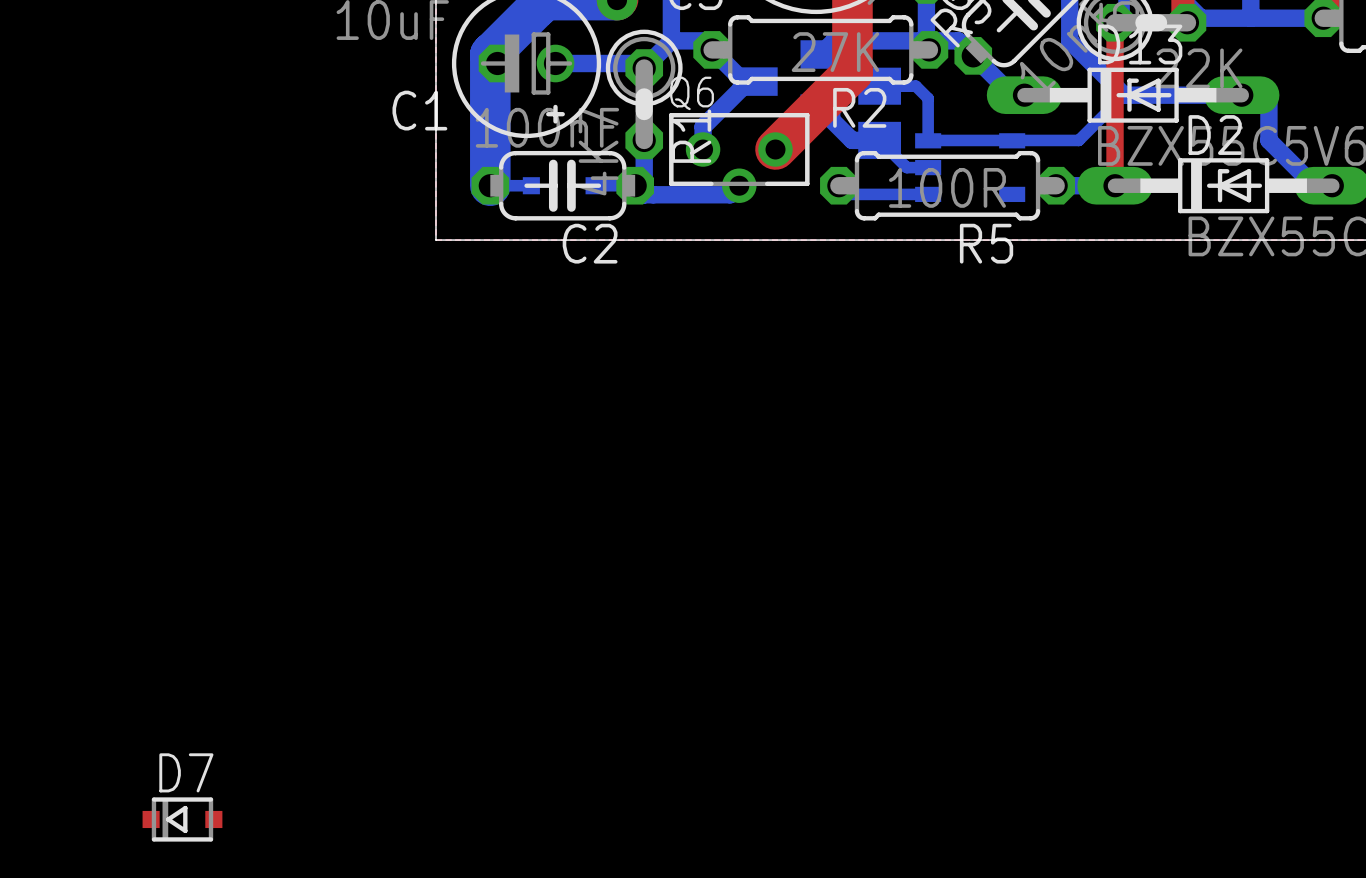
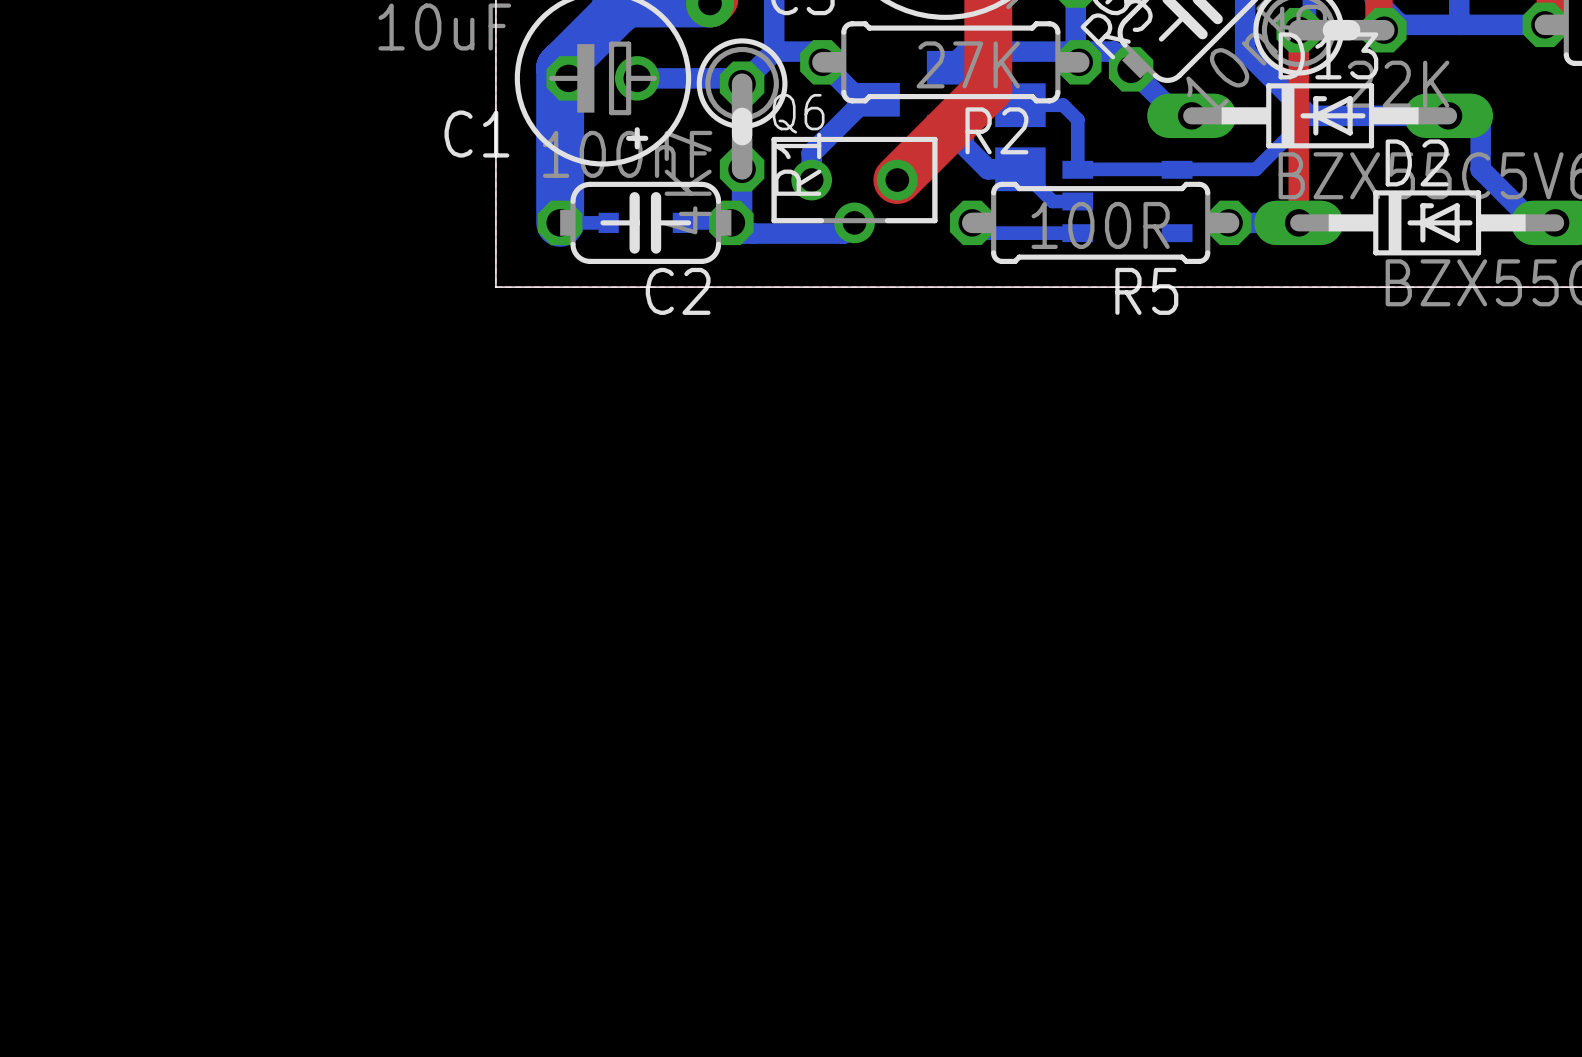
D7: (182, 819) -> none

